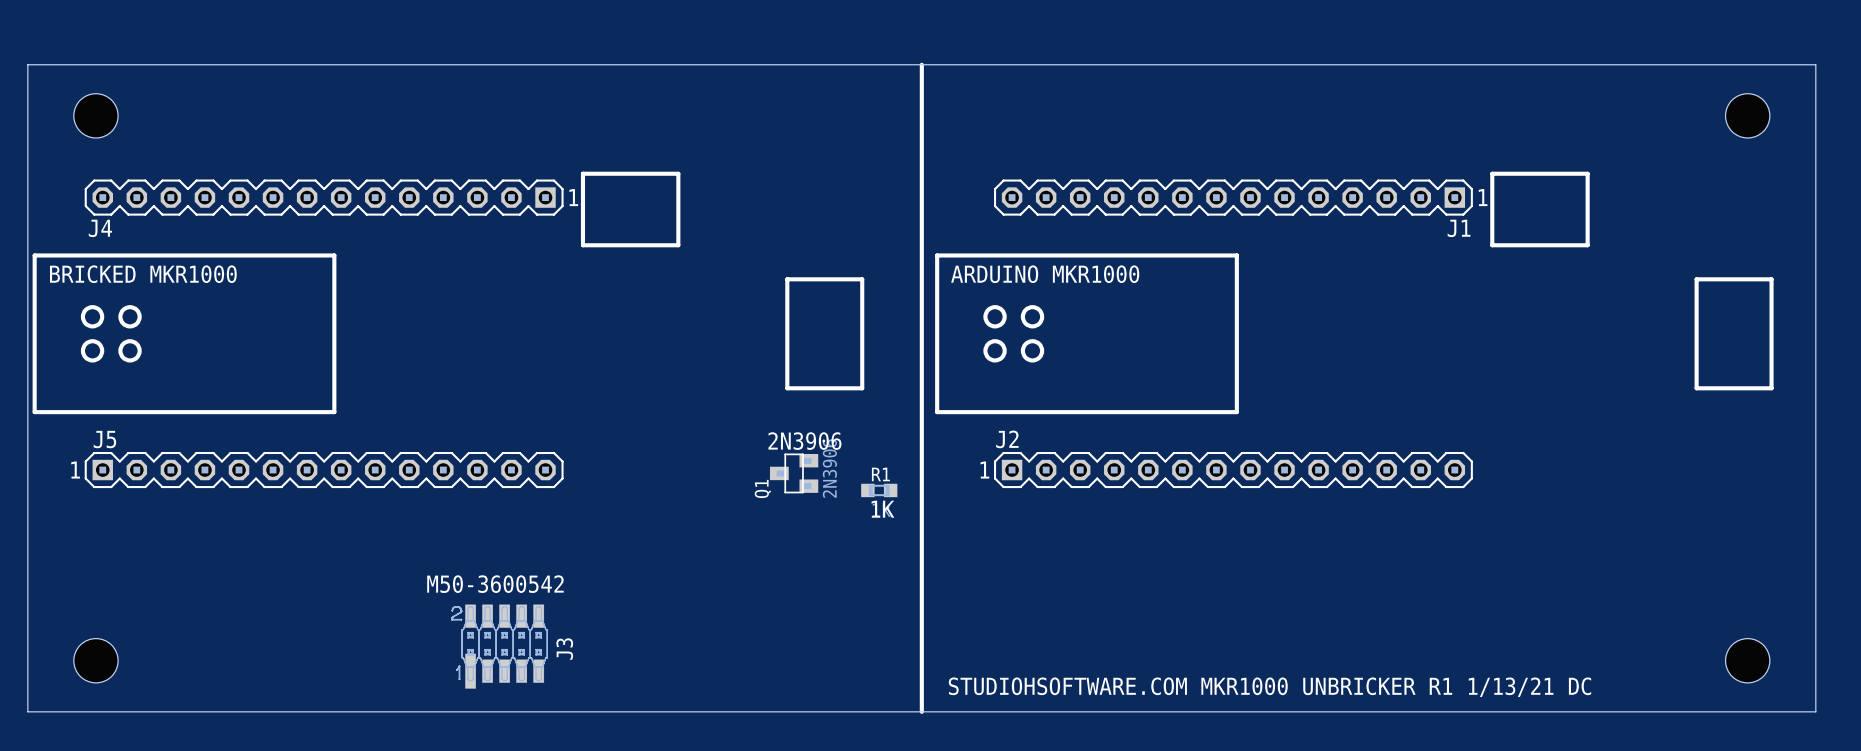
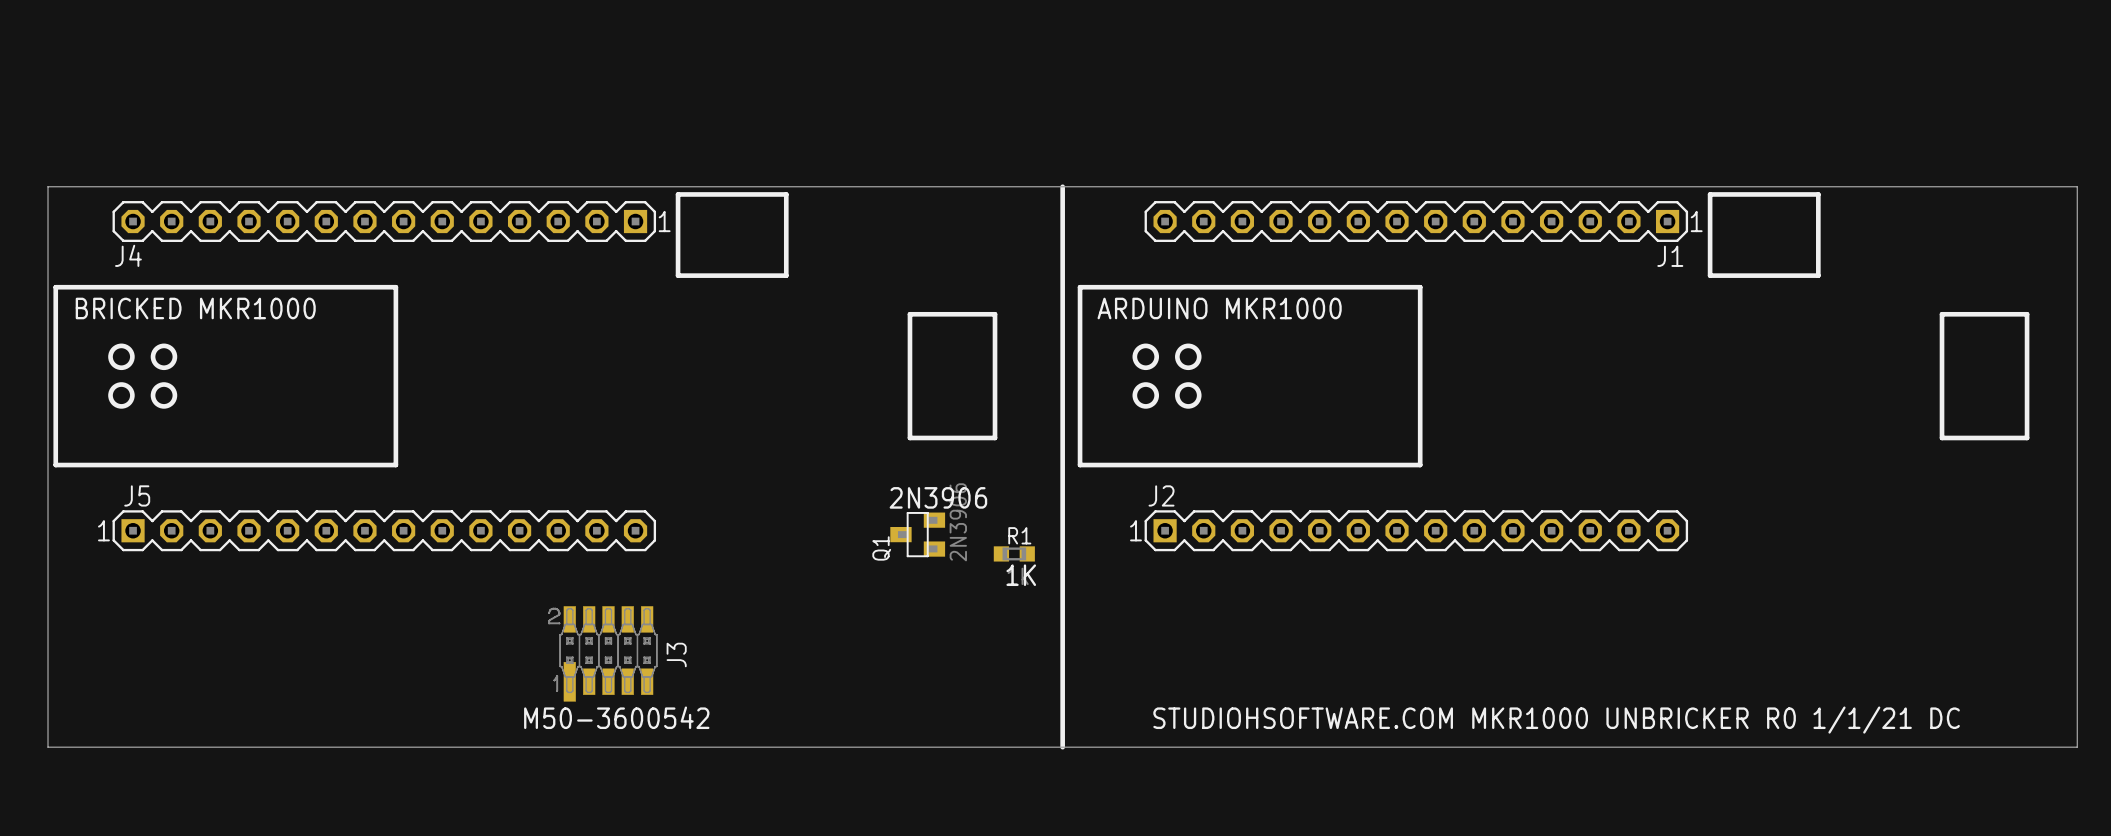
line: (921, 64) (921, 166) -> none
hole: (95, 115) -> none
hole: (1747, 115) -> none
board edge: (27, 166) (27, 64) (1815, 64) (1815, 166) -> (48, 186) (2077, 186)
text position: M50-3600542 (495, 584) -> M50-3600542 (616, 717)
text: none -> STUDIOHSOFTWARE.COM MKR1000 UNBRICKER R0 1/1/21 DC (1556, 720)
J3 position: (499, 646) -> (602, 653)
board edge: (27, 660) (27, 711) (1815, 711) (1815, 660) -> (48, 747) (2077, 747)
hole: (95, 660) -> none
line: (921, 660) (921, 711) -> none
hole: (1747, 660) -> none
text: STUDIOHSOFTWARE.COM MKR1000 UNBRICKER R1 1/13/21 DC (1269, 687) -> none

